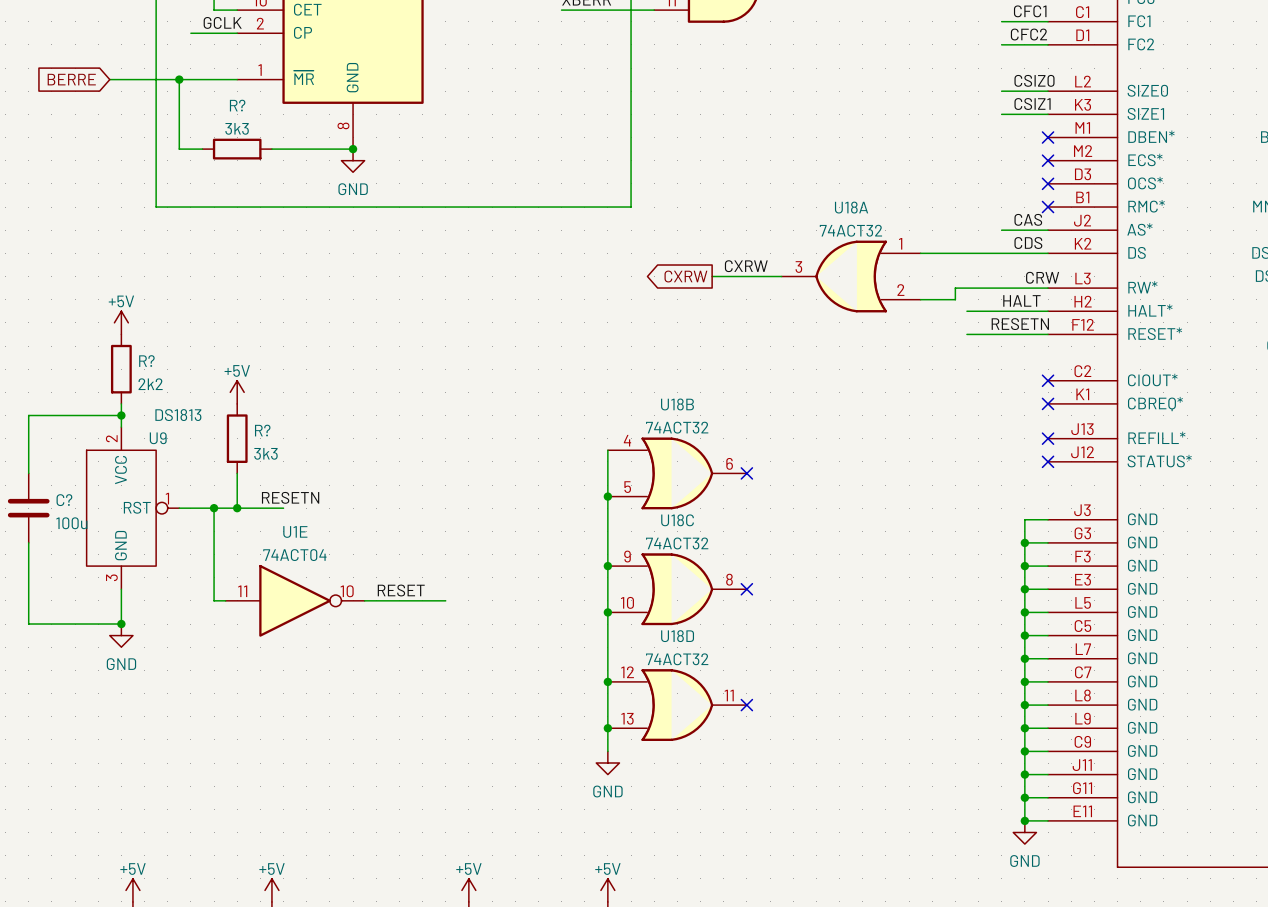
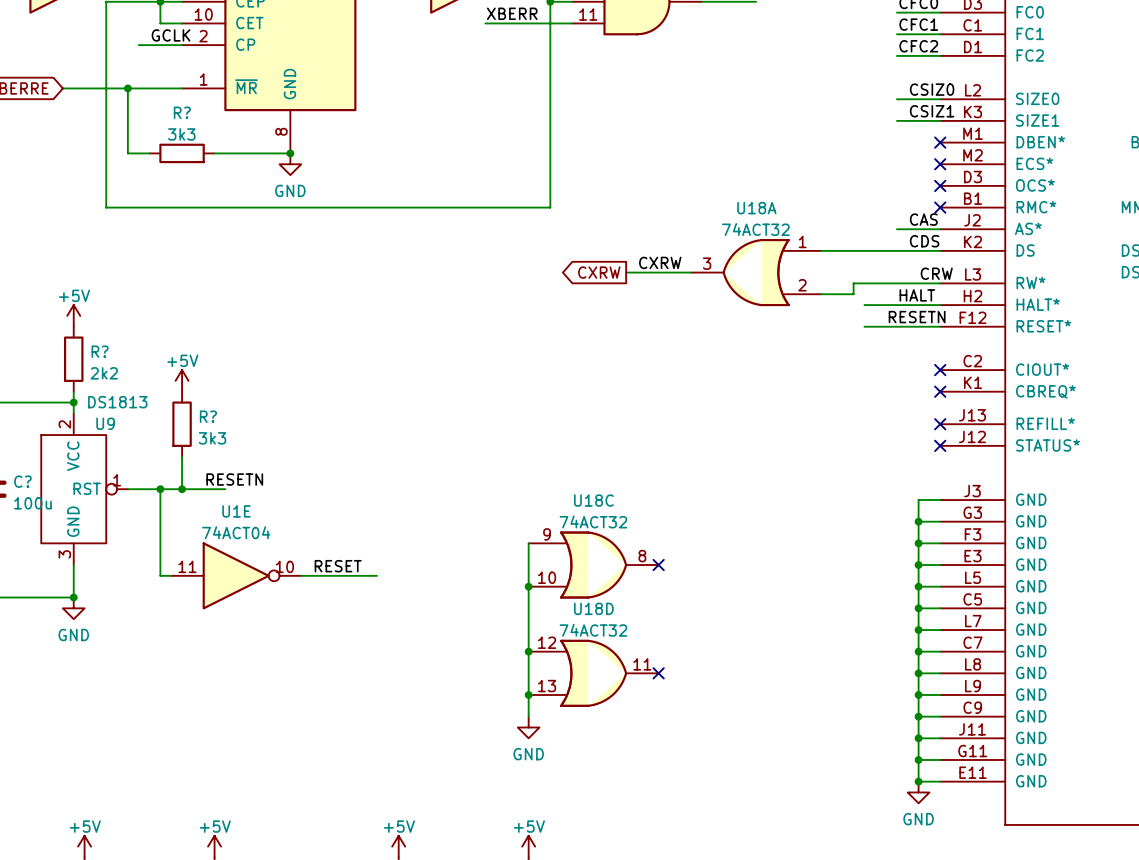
wire: (607, 450) (607, 566) -> none
U18B: 74ACT32 (677, 473) -> none
no-connect mark: (746, 473) -> none
junction: (607, 496) -> none
junction: (607, 566) -> none

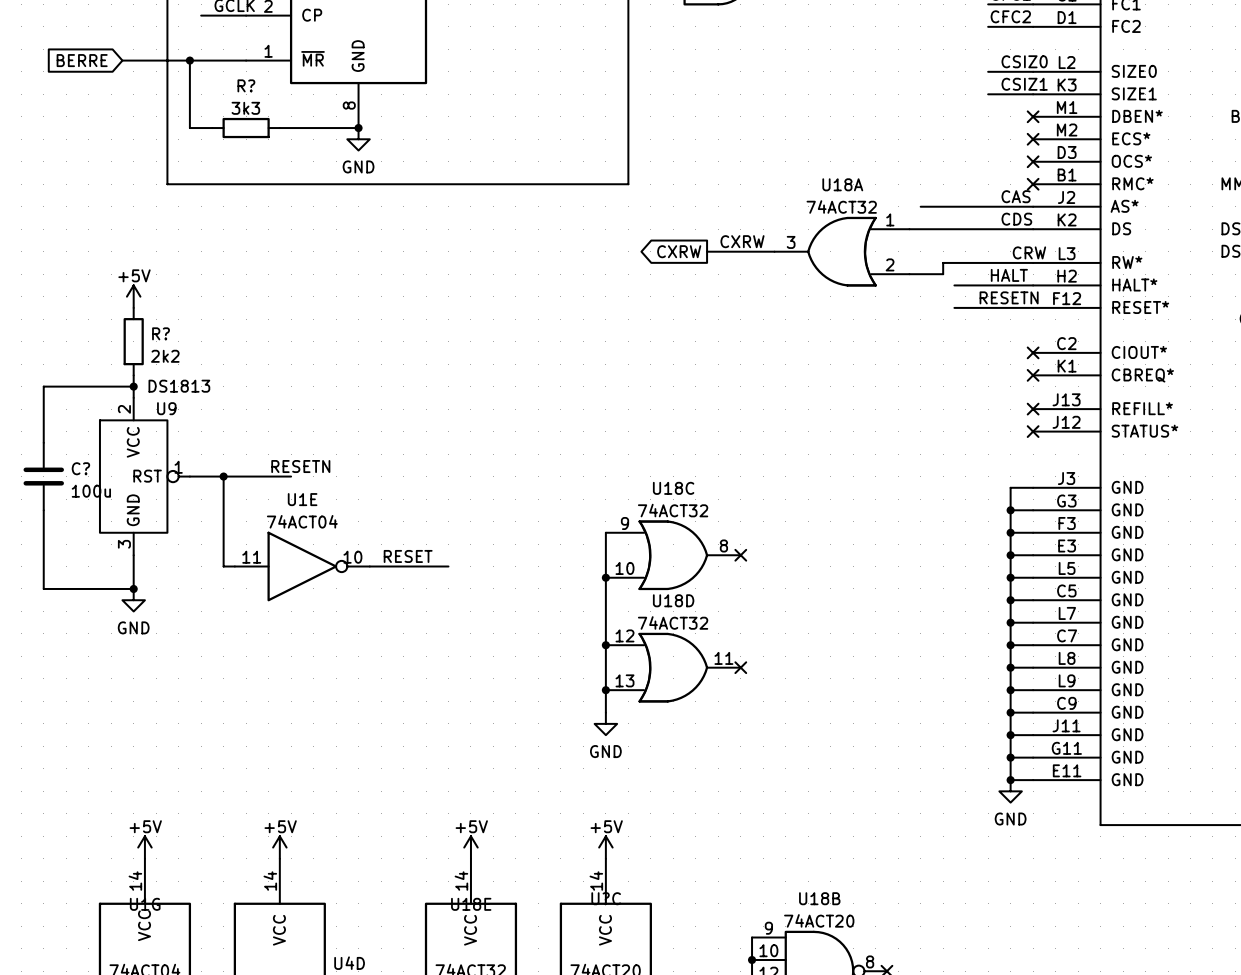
wire: none -> (920, 206) (988, 206)
power symbol: +5V (182, 380) -> none
R?: 3k3 (182, 424) -> none
wire: (182, 456) (182, 489) -> none
junction: (182, 489) -> none

